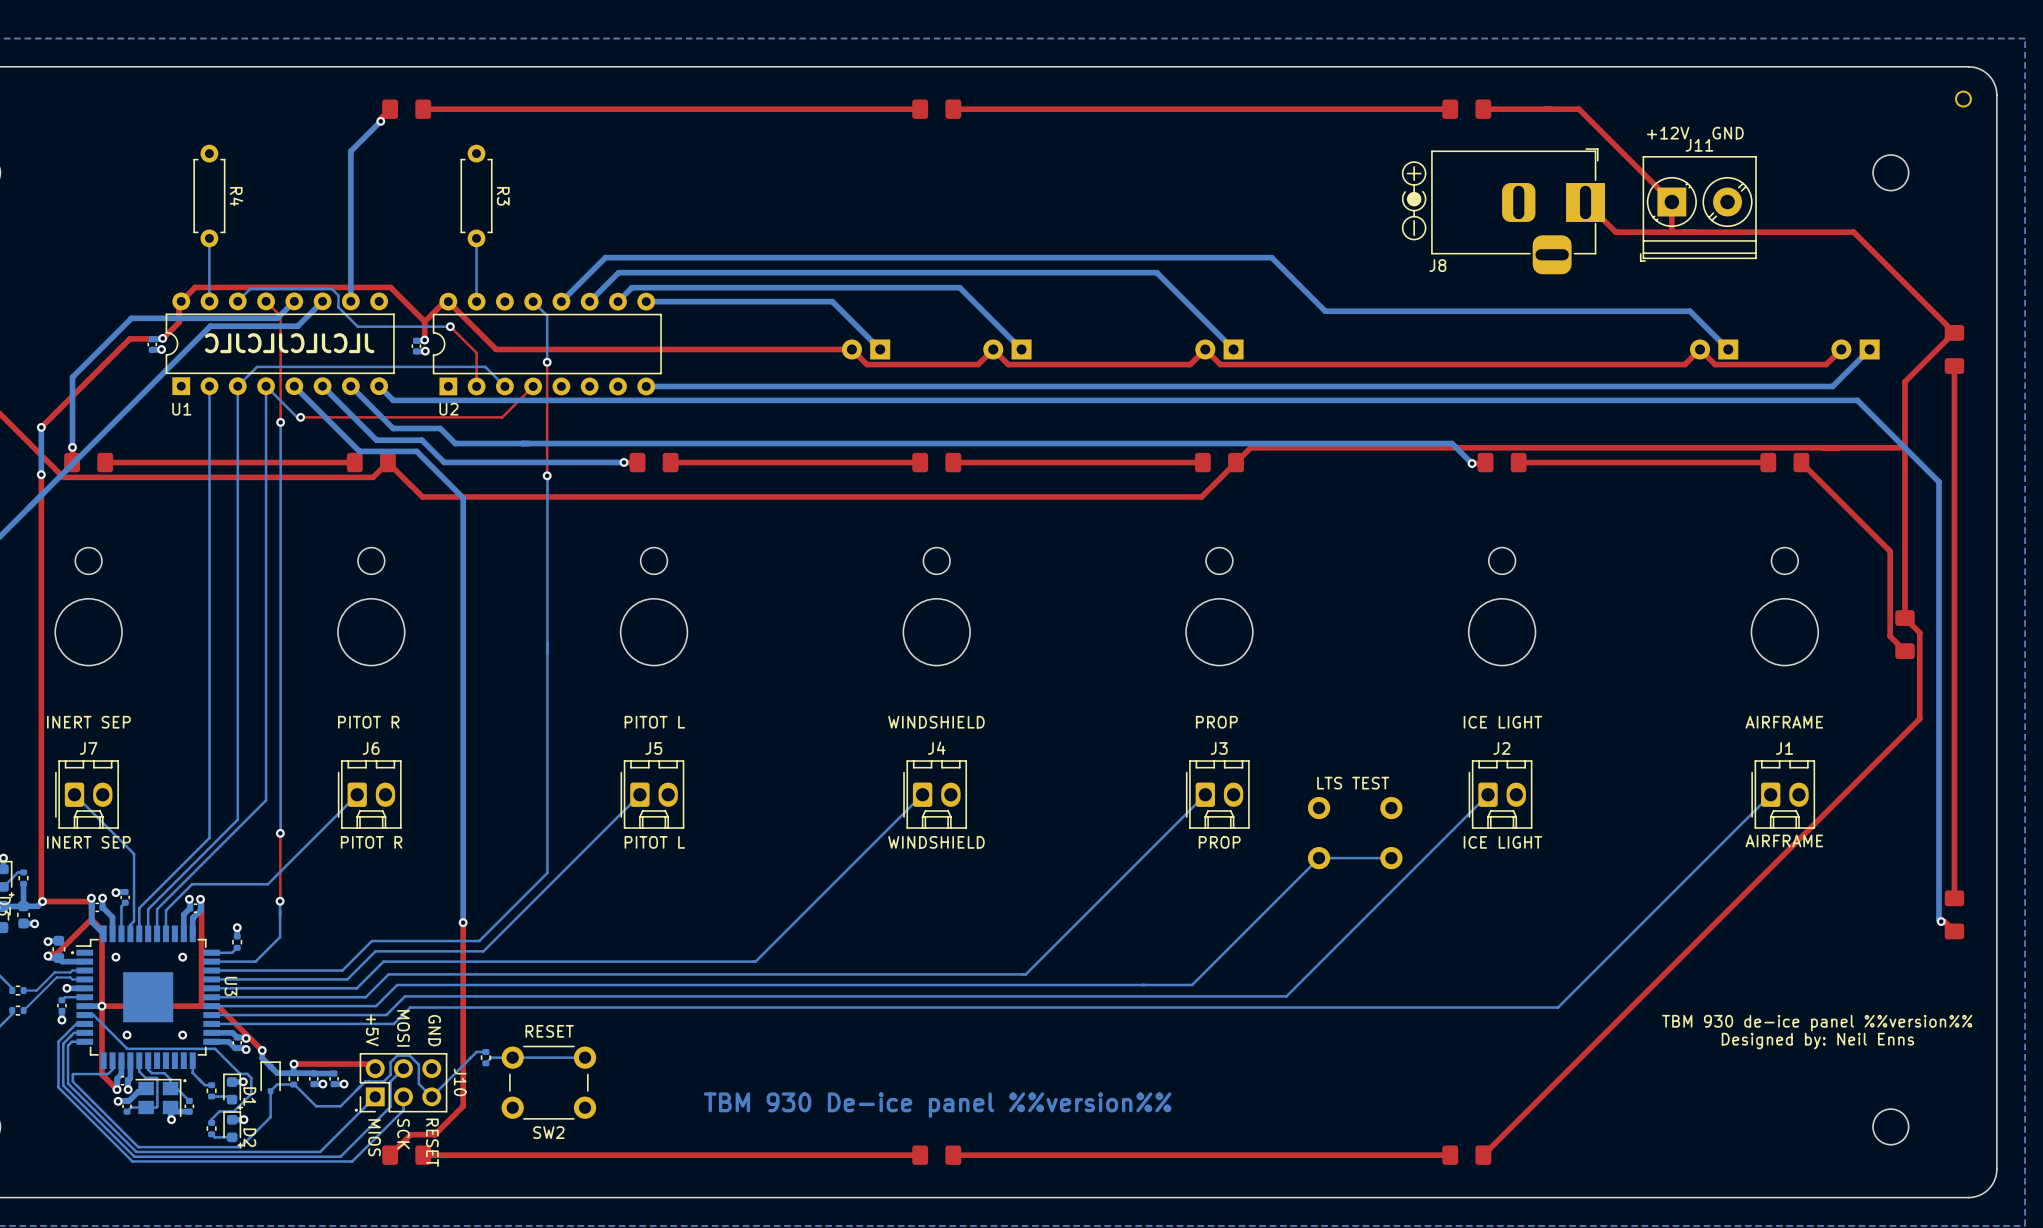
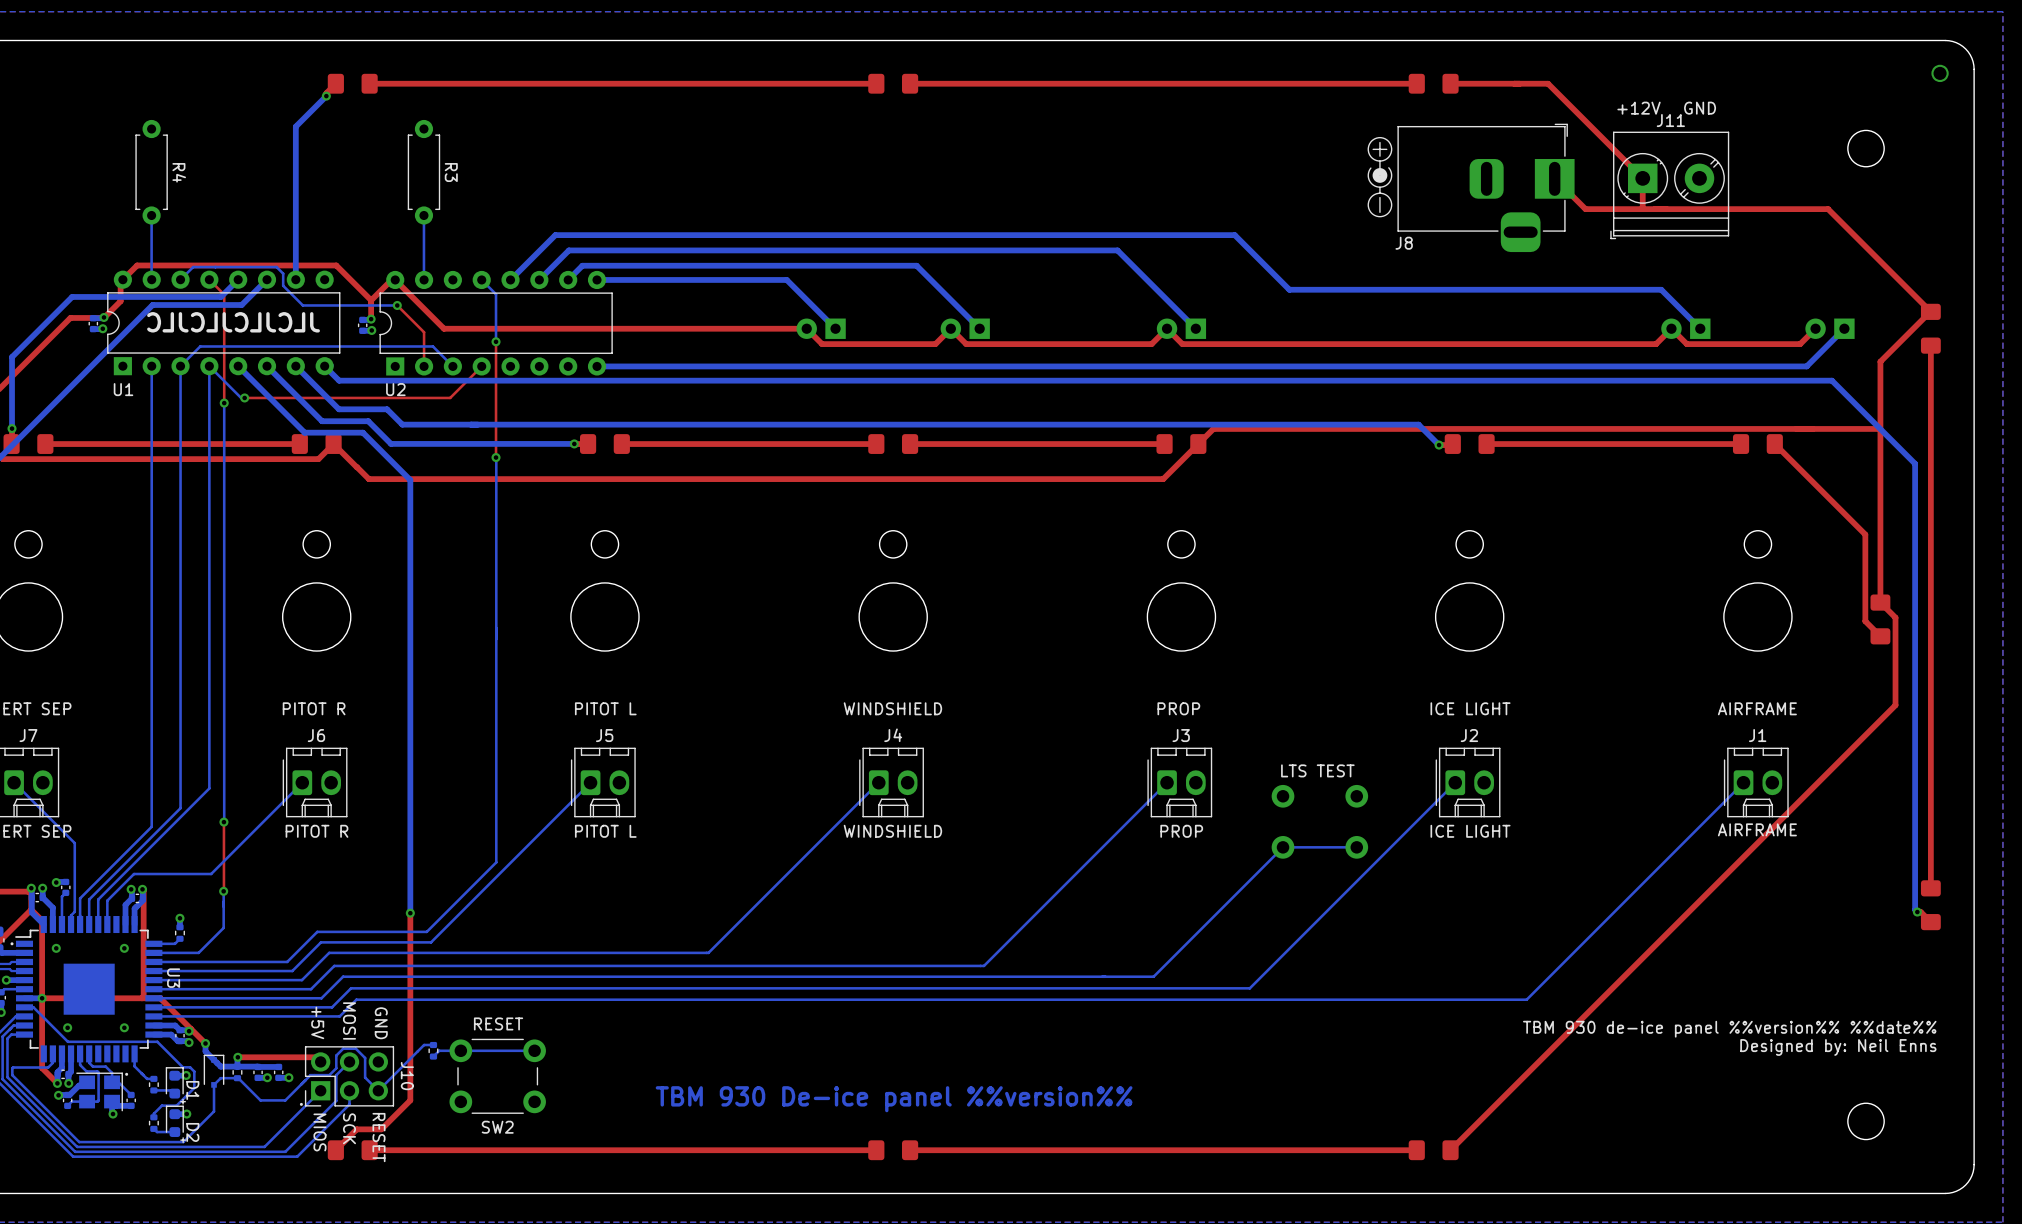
text: TBM 930 de-ice panel %%version%% (1817, 1023) -> TBM 930 de-ice panel %%version%% %%date%% (1729, 1029)
text position: Designed by: Neil Enns (1817, 1041) -> Designed by: Neil Enns (1838, 1047)

